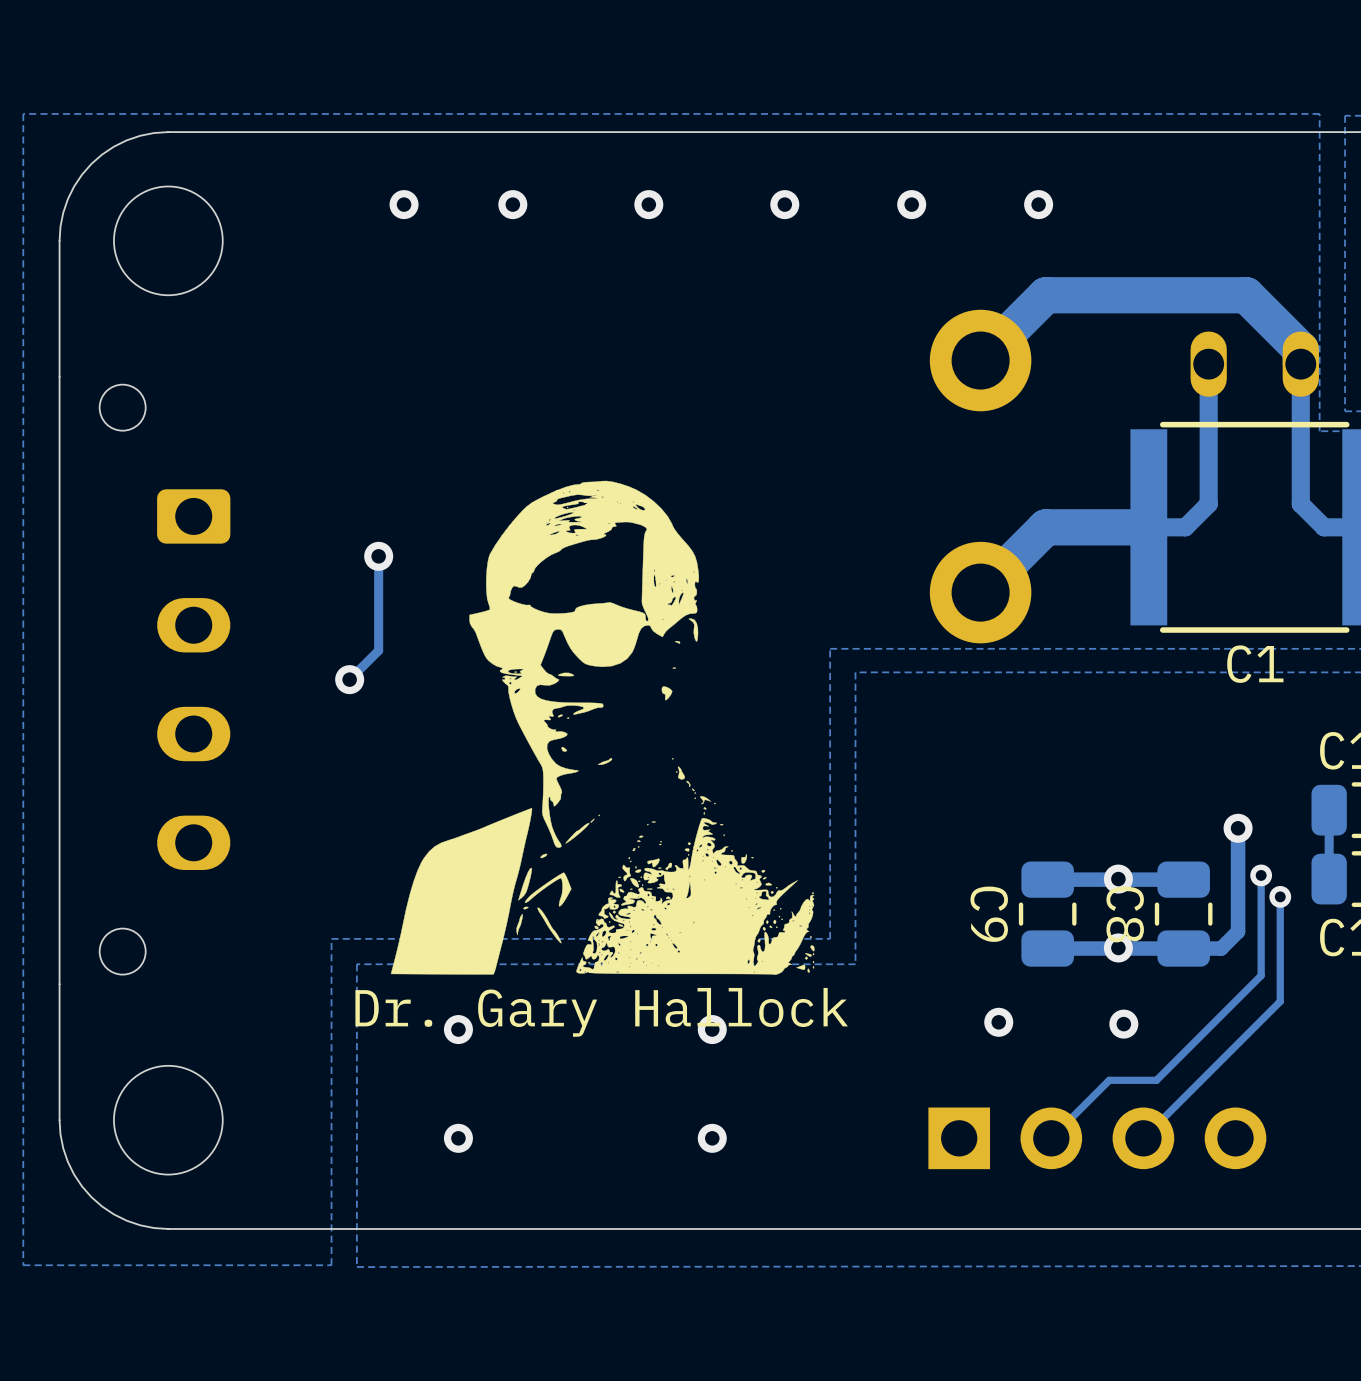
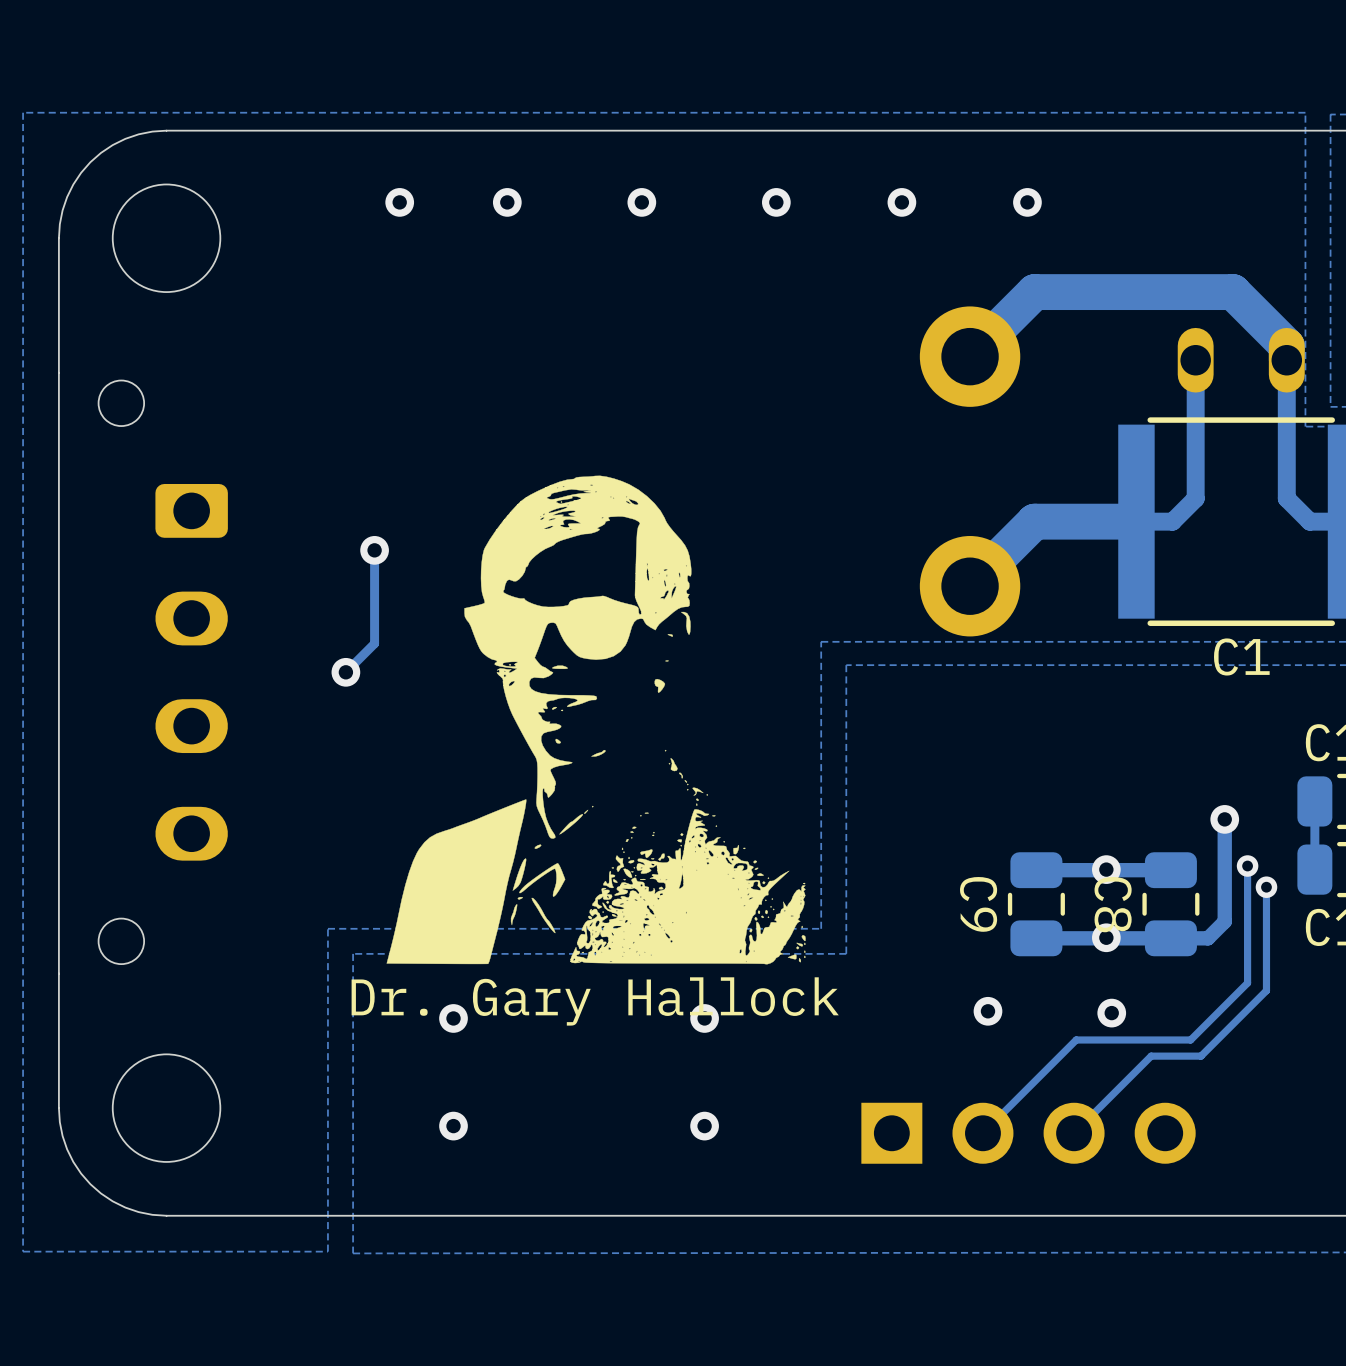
track: (1261, 975) (1156, 1080) (1109, 1080) (1051, 1138) -> (1247, 965) (1247, 983) (1190, 1039) (1076, 1039) (982, 1133)
track: (1214, 1067) (1143, 1138) -> (1201, 1056) (1151, 1056) (1074, 1133)
part position: (1097, 1138) -> (1028, 1133)

